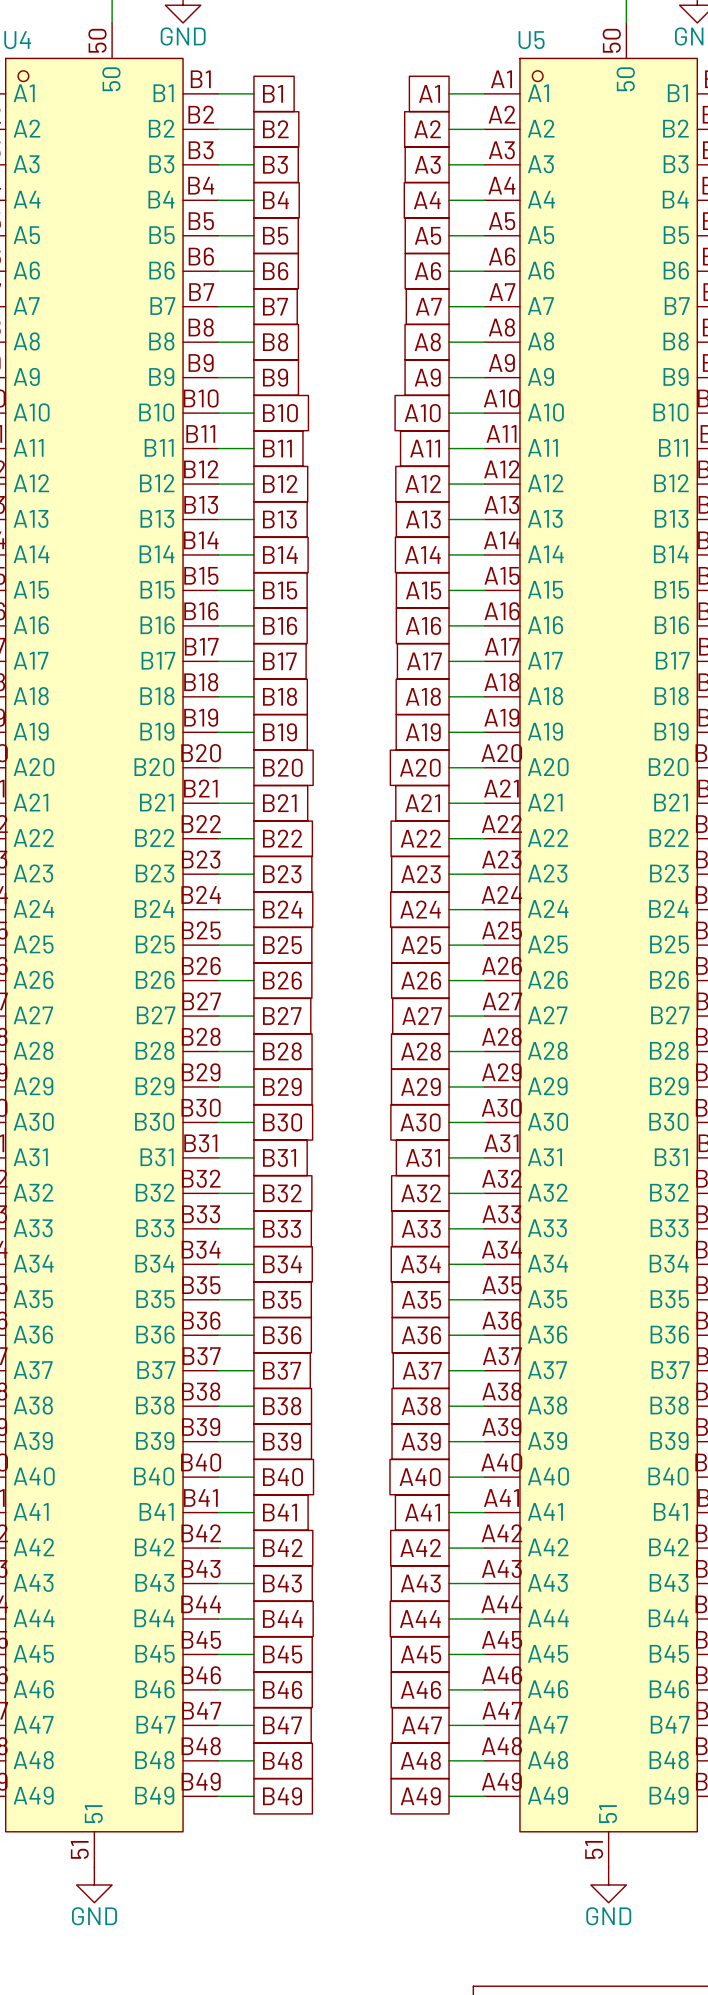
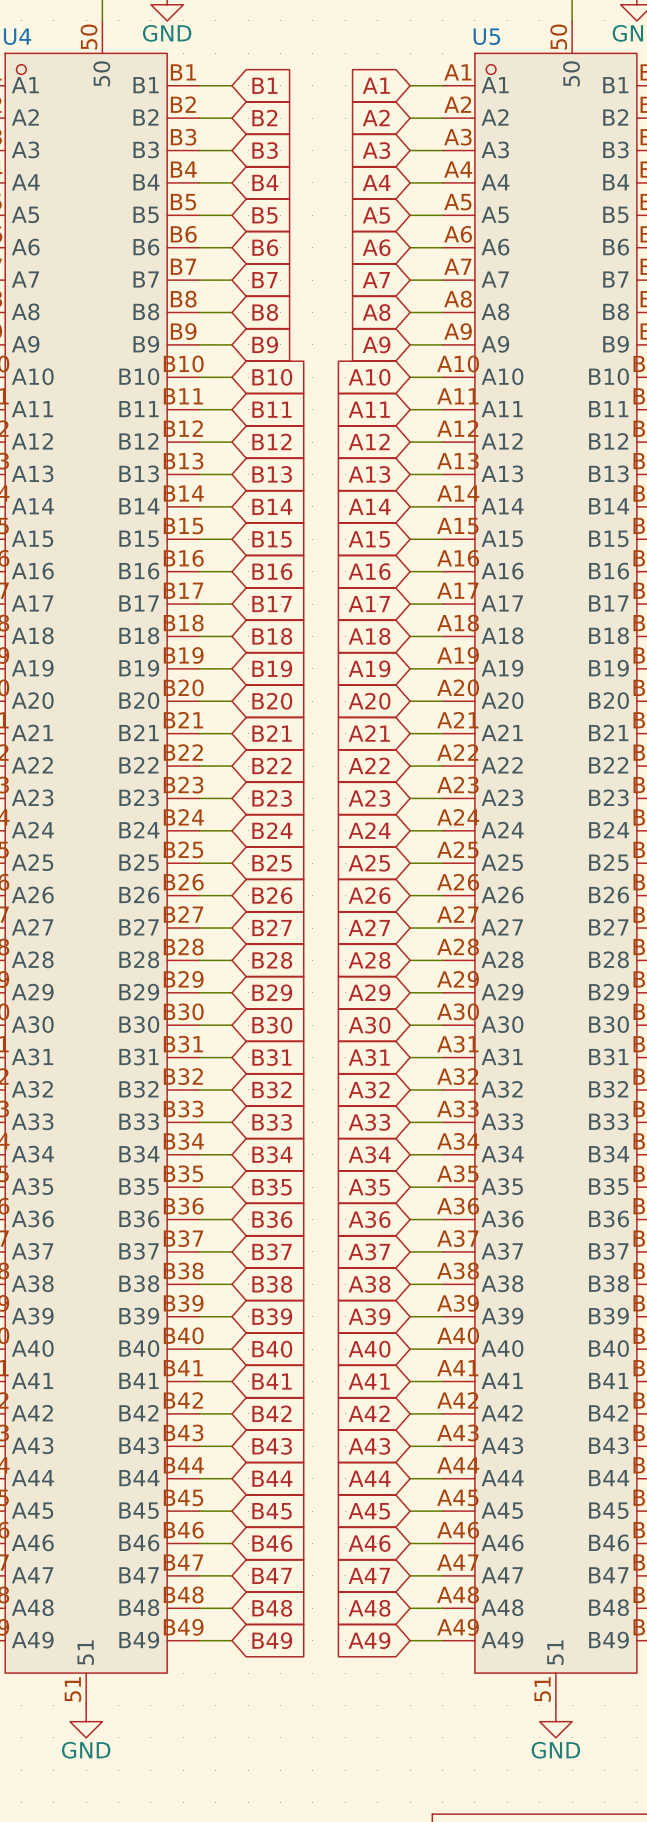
global label shape: passive (273, 93) -> input (264, 85)
global label shape: passive (429, 93) -> input (376, 85)
global label shape: passive (275, 129) -> input (264, 118)
global label shape: passive (427, 129) -> input (376, 118)
global label shape: passive (275, 164) -> input (265, 150)
global label shape: passive (427, 164) -> input (376, 150)
global label shape: passive (275, 200) -> input (265, 182)
global label shape: passive (427, 200) -> input (376, 182)
global label shape: passive (275, 235) -> input (264, 215)
global label shape: passive (427, 235) -> input (376, 215)
global label shape: passive (275, 271) -> input (265, 247)
global label shape: passive (427, 271) -> input (376, 247)
global label shape: passive (275, 306) -> input (265, 280)
global label shape: passive (428, 306) -> input (376, 280)
global label shape: passive (275, 342) -> input (265, 312)
global label shape: passive (427, 342) -> input (376, 312)
global label shape: passive (275, 377) -> input (265, 344)
global label shape: passive (427, 377) -> input (376, 344)
global label shape: passive (280, 413) -> input (272, 377)
global label shape: passive (422, 413) -> input (369, 377)
global label shape: passive (277, 448) -> input (272, 409)
global label shape: passive (425, 448) -> input (369, 409)
global label shape: passive (280, 483) -> input (271, 441)
global label shape: passive (423, 483) -> input (369, 441)
global label shape: passive (279, 519) -> input (272, 474)
global label shape: passive (423, 519) -> input (369, 474)
global label shape: passive (280, 554) -> input (272, 506)
global label shape: passive (422, 554) -> input (369, 506)
global label shape: passive (280, 590) -> input (272, 539)
global label shape: passive (423, 590) -> input (369, 539)
global label shape: passive (280, 625) -> input (272, 571)
global label shape: passive (423, 625) -> input (369, 571)
global label shape: passive (279, 661) -> input (272, 604)
global label shape: passive (424, 661) -> input (369, 604)
global label shape: passive (280, 696) -> input (272, 636)
global label shape: passive (423, 696) -> input (369, 636)
global label shape: passive (279, 732) -> input (272, 668)
global label shape: passive (423, 732) -> input (369, 668)
global label shape: passive (282, 767) -> input (272, 701)
global label shape: passive (420, 767) -> input (369, 701)
global label shape: passive (279, 803) -> input (272, 733)
global label shape: passive (422, 803) -> input (369, 733)
global label shape: passive (282, 838) -> input (271, 765)
global label shape: passive (420, 838) -> input (369, 765)
global label shape: passive (282, 874) -> input (272, 798)
global label shape: passive (420, 874) -> input (369, 798)
global label shape: passive (282, 909) -> input (272, 830)
global label shape: passive (420, 909) -> input (369, 830)
global label shape: passive (282, 945) -> input (272, 863)
global label shape: passive (421, 945) -> input (369, 863)
global label shape: passive (282, 980) -> input (272, 895)
global label shape: passive (421, 980) -> input (369, 895)
global label shape: passive (282, 1015) -> input (272, 927)
global label shape: passive (422, 1015) -> input (369, 927)
global label shape: passive (282, 1051) -> input (272, 960)
global label shape: passive (420, 1051) -> input (369, 960)
global label shape: passive (282, 1086) -> input (272, 992)
global label shape: passive (420, 1086) -> input (369, 992)
global label shape: passive (282, 1122) -> input (272, 1025)
global label shape: passive (420, 1122) -> input (369, 1025)
global label shape: passive (279, 1158) -> input (272, 1057)
global label shape: passive (422, 1158) -> input (369, 1057)
global label shape: passive (282, 1193) -> input (271, 1089)
global label shape: passive (421, 1193) -> input (369, 1089)
global label shape: passive (281, 1228) -> input (272, 1122)
global label shape: passive (421, 1228) -> input (369, 1122)
global label shape: passive (282, 1264) -> input (272, 1154)
global label shape: passive (420, 1264) -> input (369, 1154)
global label shape: passive (282, 1299) -> input (272, 1187)
global label shape: passive (421, 1299) -> input (369, 1187)
global label shape: passive (282, 1335) -> input (272, 1219)
global label shape: passive (421, 1335) -> input (369, 1219)
global label shape: passive (281, 1370) -> input (272, 1251)
global label shape: passive (422, 1370) -> input (369, 1251)
global label shape: passive (282, 1406) -> input (272, 1284)
global label shape: passive (421, 1406) -> input (369, 1284)
global label shape: passive (282, 1441) -> input (272, 1316)
global label shape: passive (421, 1441) -> input (369, 1316)
global label shape: passive (282, 1477) -> input (272, 1349)
global label shape: passive (420, 1477) -> input (369, 1349)
global label shape: passive (279, 1512) -> input (272, 1381)
global label shape: passive (422, 1512) -> input (369, 1381)
global label shape: passive (282, 1547) -> input (271, 1413)
global label shape: passive (420, 1547) -> input (369, 1413)
global label shape: passive (282, 1583) -> input (272, 1446)
global label shape: passive (420, 1583) -> input (369, 1446)
global label shape: passive (282, 1618) -> input (272, 1478)
global label shape: passive (420, 1618) -> input (369, 1478)
global label shape: passive (282, 1654) -> input (272, 1511)
global label shape: passive (420, 1654) -> input (369, 1511)
global label shape: passive (282, 1689) -> input (272, 1543)
global label shape: passive (420, 1689) -> input (369, 1543)
global label shape: passive (282, 1725) -> input (272, 1575)
global label shape: passive (421, 1725) -> input (369, 1575)
global label shape: passive (282, 1760) -> input (272, 1608)
global label shape: passive (420, 1760) -> input (369, 1608)
global label shape: passive (282, 1796) -> input (272, 1640)
global label shape: passive (420, 1796) -> input (369, 1640)

